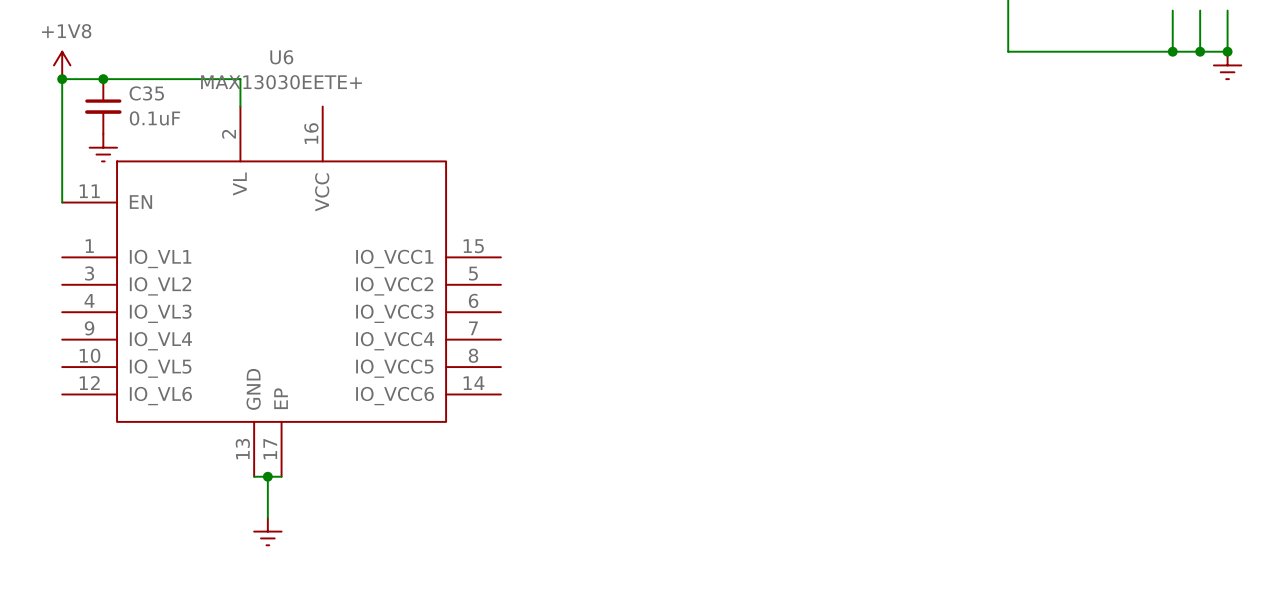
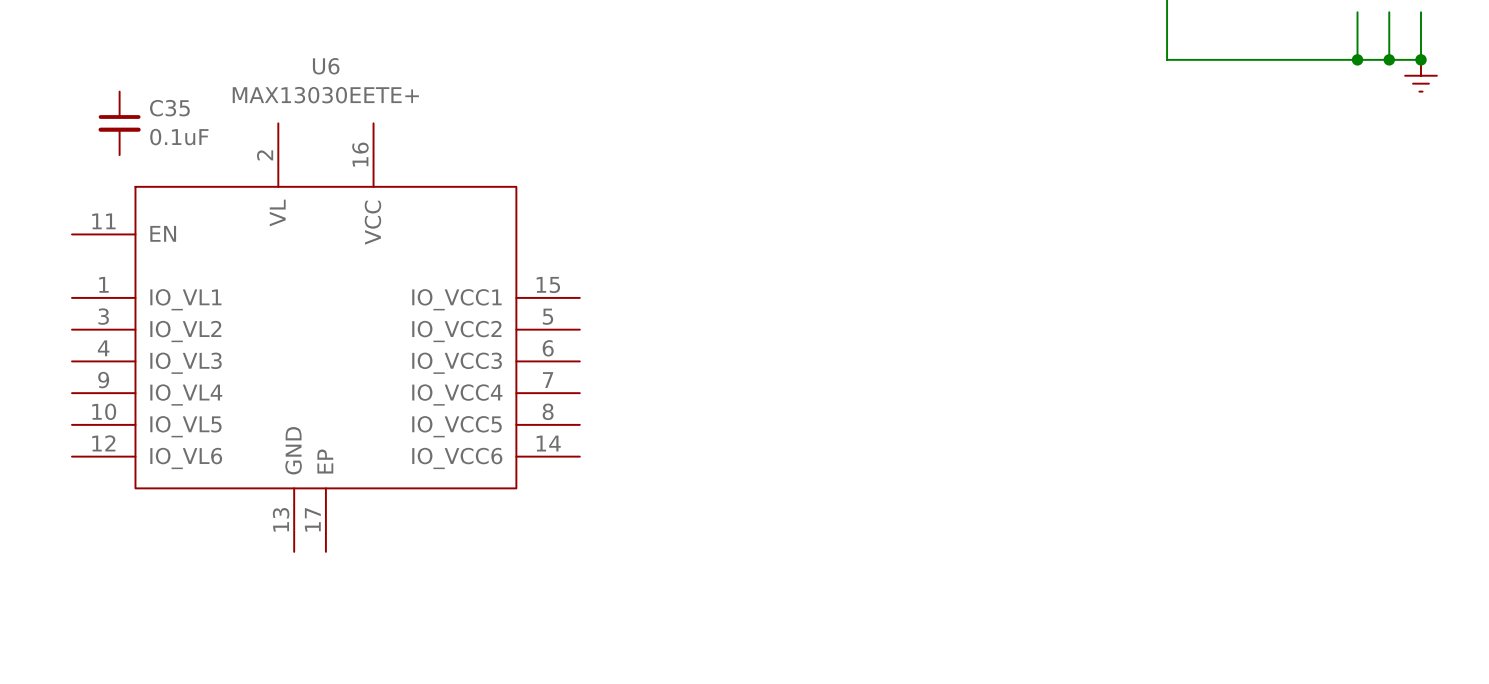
power symbol: +1V8 (62, 65) -> none
junction: (62, 79) -> none
junction: (103, 79) -> none
wire: (240, 106) (240, 79) (62, 79) (62, 202) -> none
power symbol: (103, 147) -> none
wire: (254, 476) (281, 476) -> none
wire: (267, 476) (267, 517) -> none
junction: (267, 476) -> none
power symbol: (267, 531) -> none

